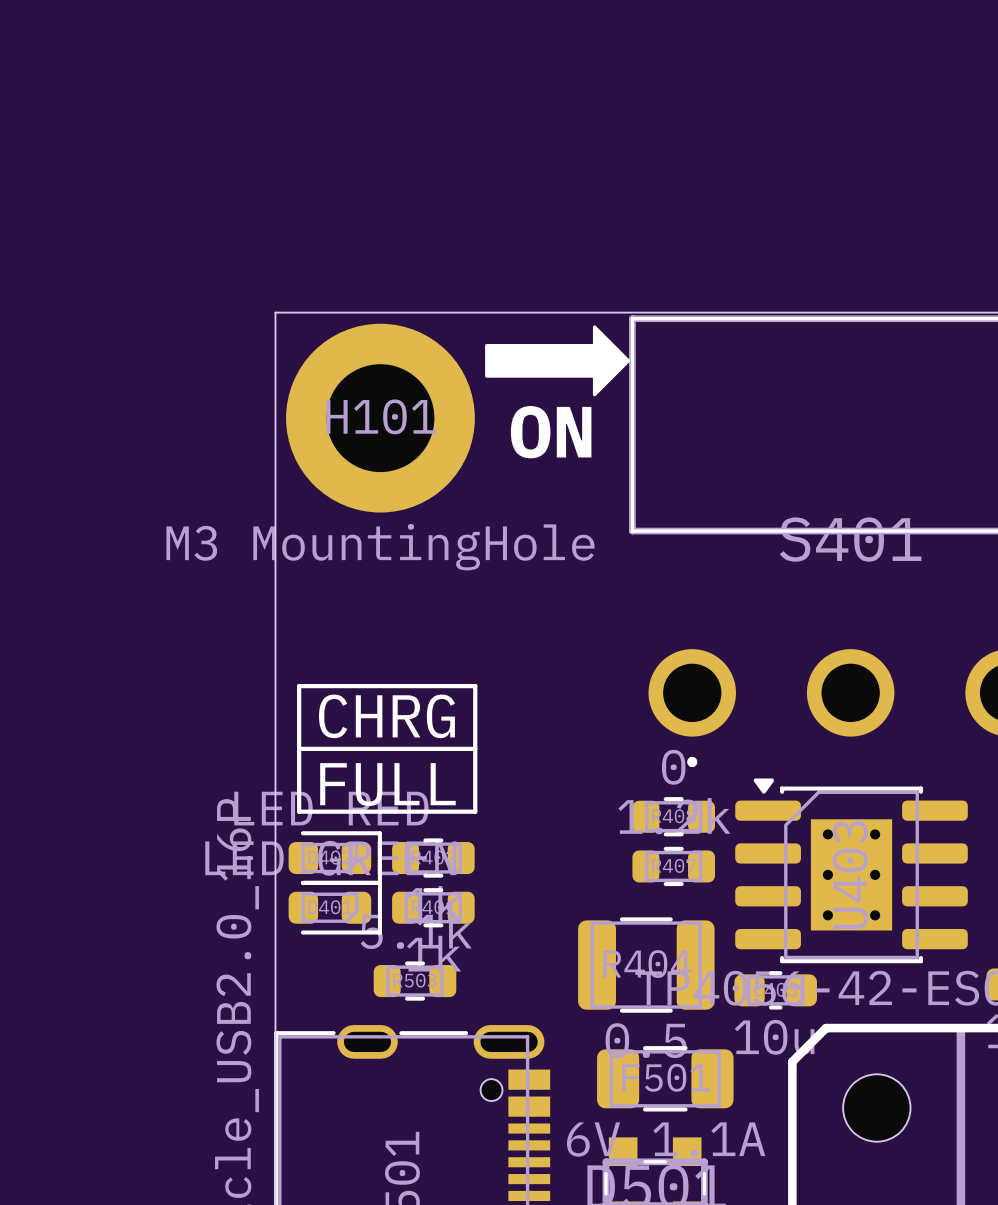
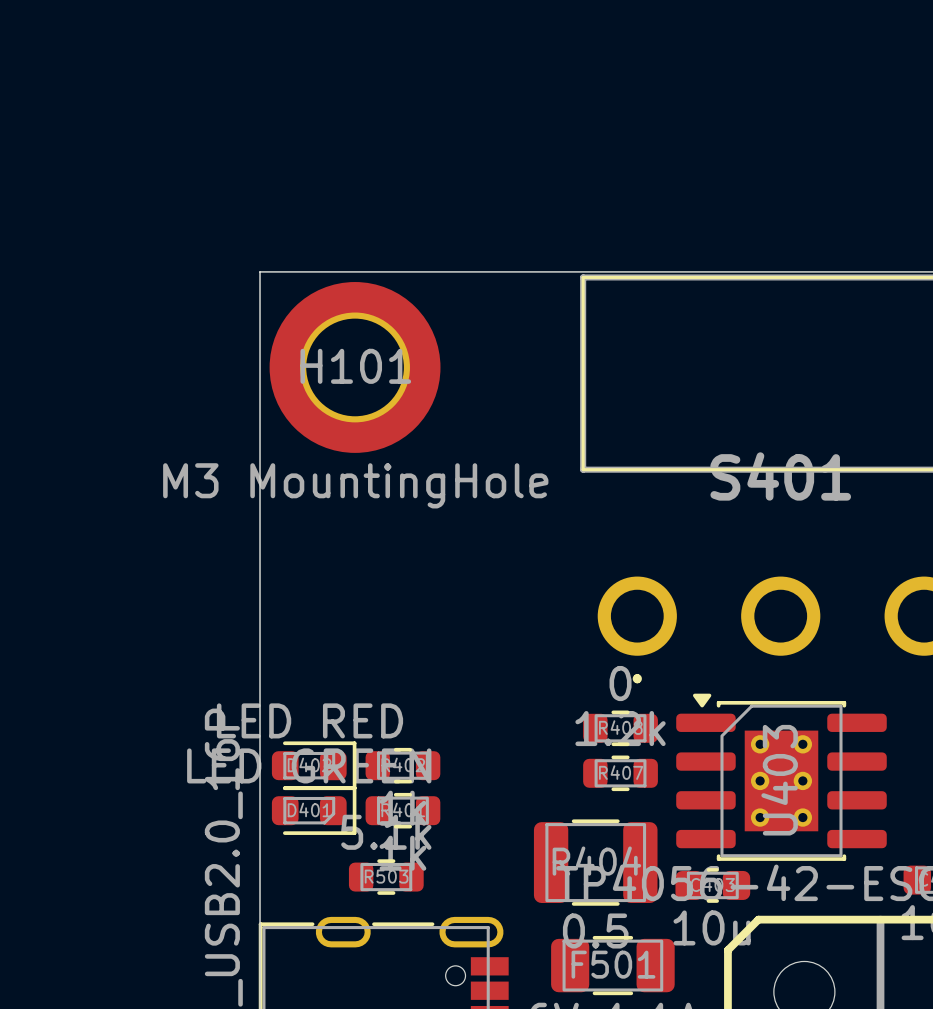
drawing: [485, 325, 631, 397] -> none
text: ON (551, 432) -> none
line: (299, 686) (475, 686) (475, 811) (299, 811) (299, 686) -> none
text: CHRG (386, 716) -> none
line: (299, 748) (475, 748) -> none
text: FULL (387, 784) -> none

